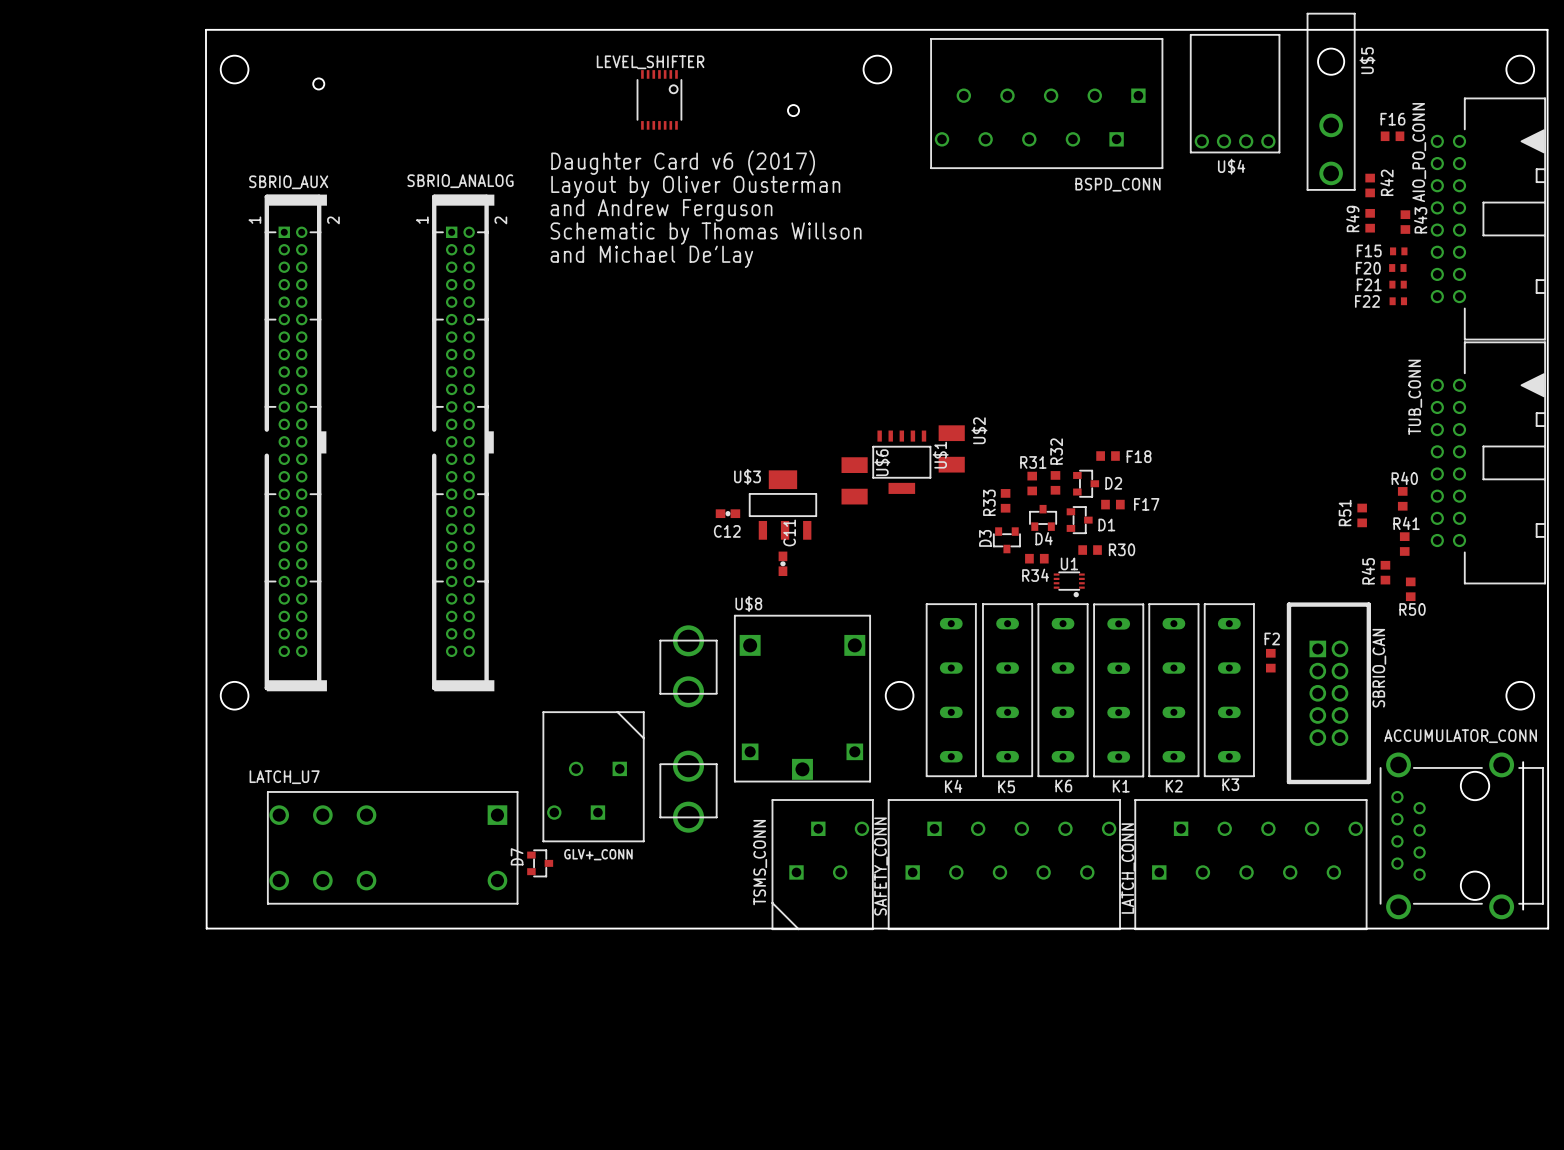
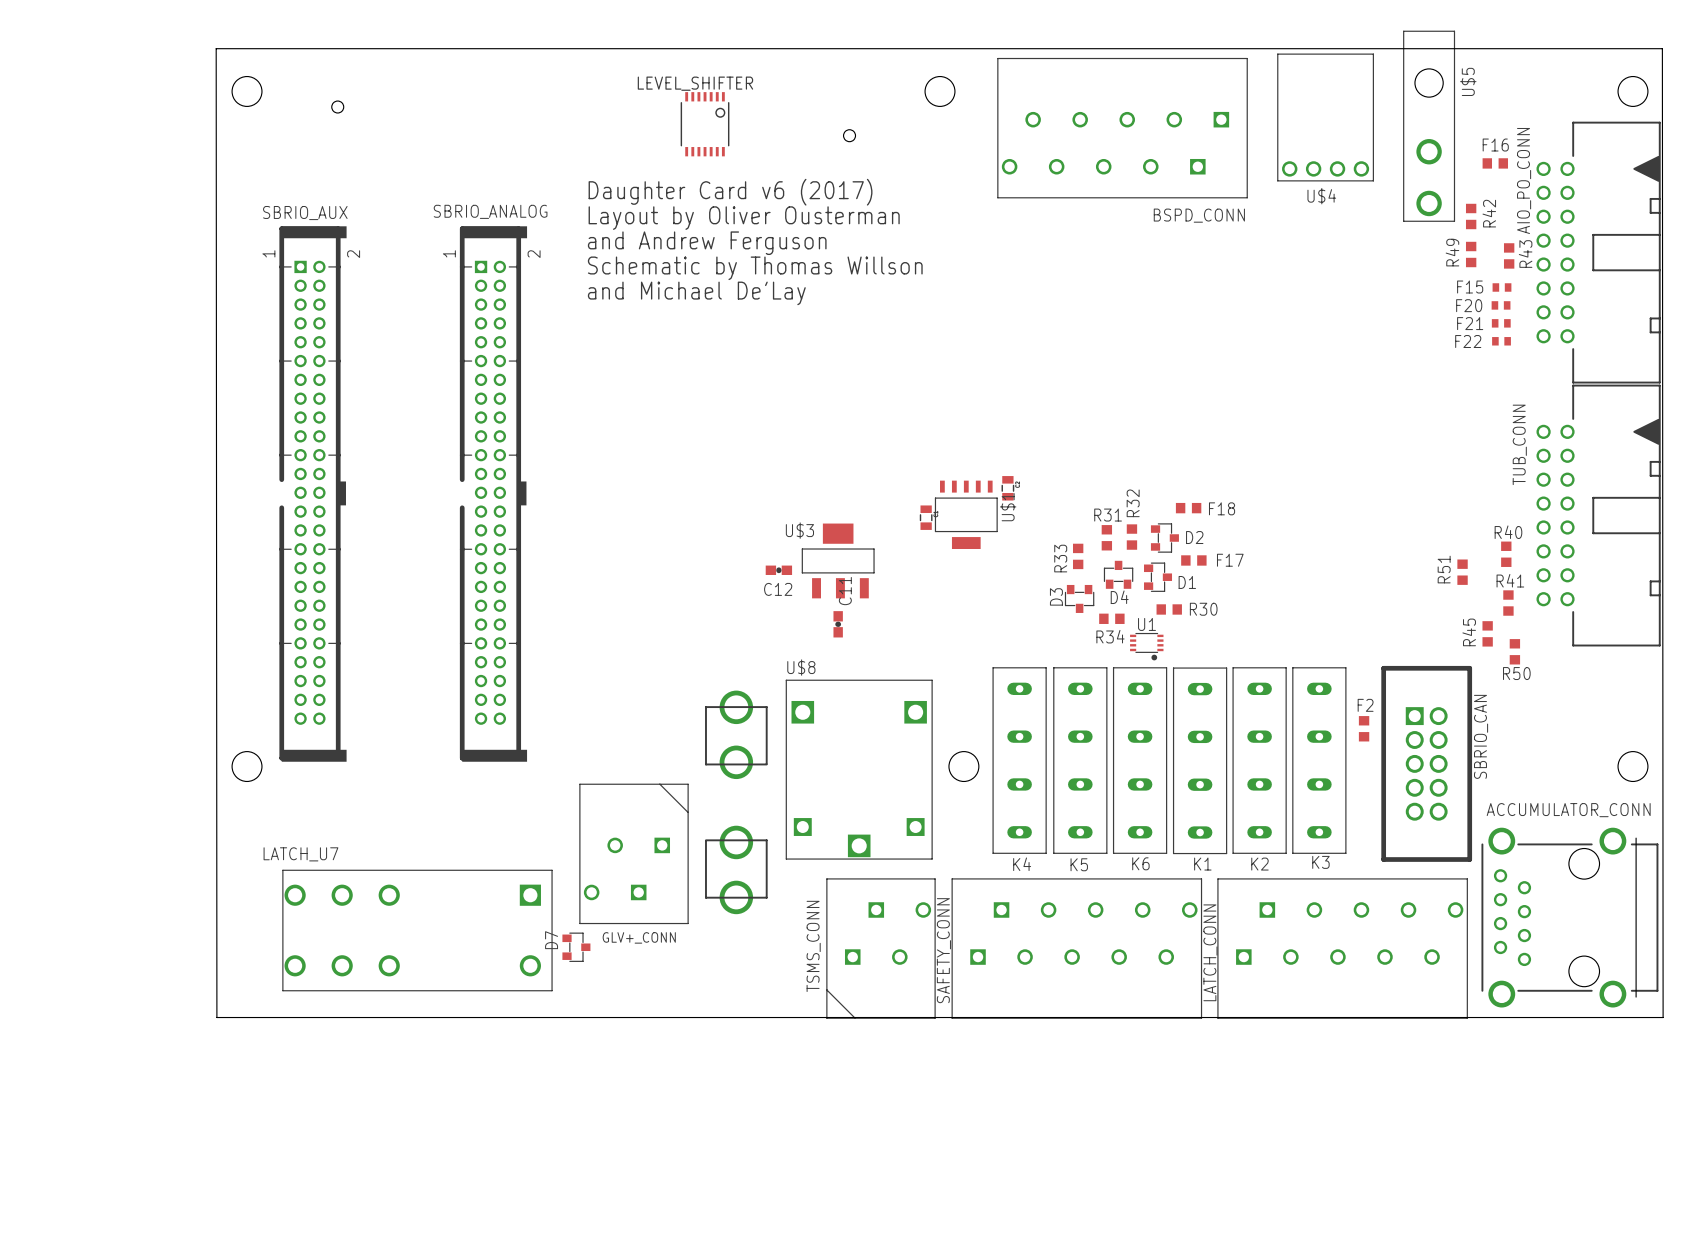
part: none -> (1007, 488)
U$2: (951, 448) -> none
part: none -> (926, 517)
U$6: (854, 480) -> none

